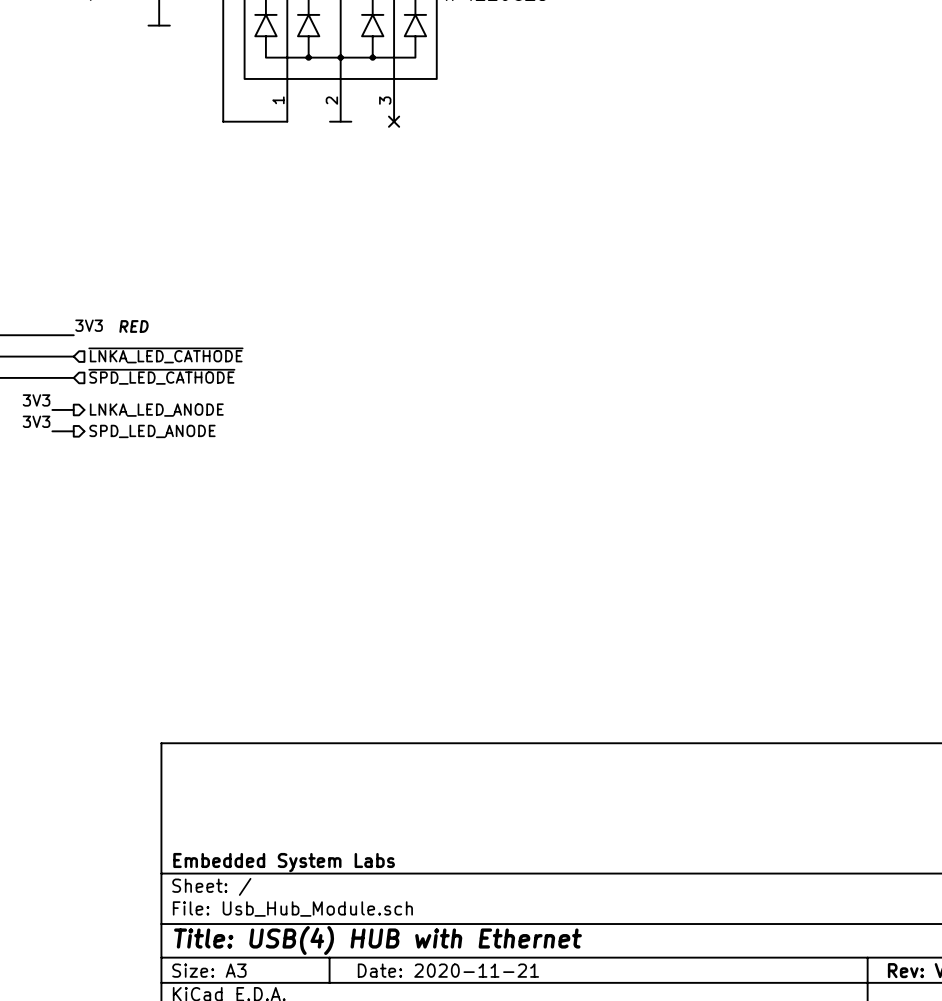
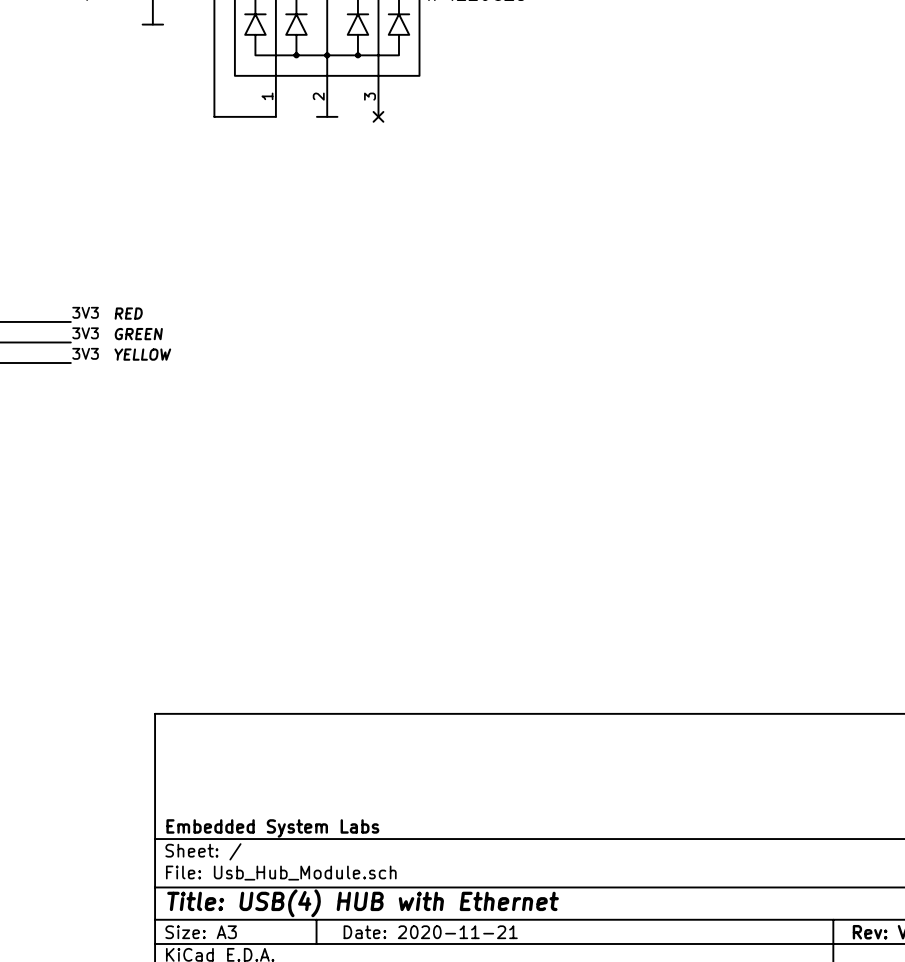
label: none -> 3V3 (85, 333)
text: none -> GREEN (138, 334)
hierarchical label: ~{LNKA_LED_CATHODE} (165, 355) -> none
label: none -> 3V3 (85, 353)
text: none -> YELLOW (142, 354)
hierarchical label: ~{SPD_LED_CATHODE} (161, 376) -> none
label: 3V3 (36, 400) -> none
wire: (52, 409) (73, 409) -> none
hierarchical label: LNKA_LED_ANODE (156, 410) -> none
label: 3V3 (36, 421) -> none
wire: (52, 431) (73, 431) -> none
hierarchical label: SPD_LED_ANODE (152, 431) -> none

